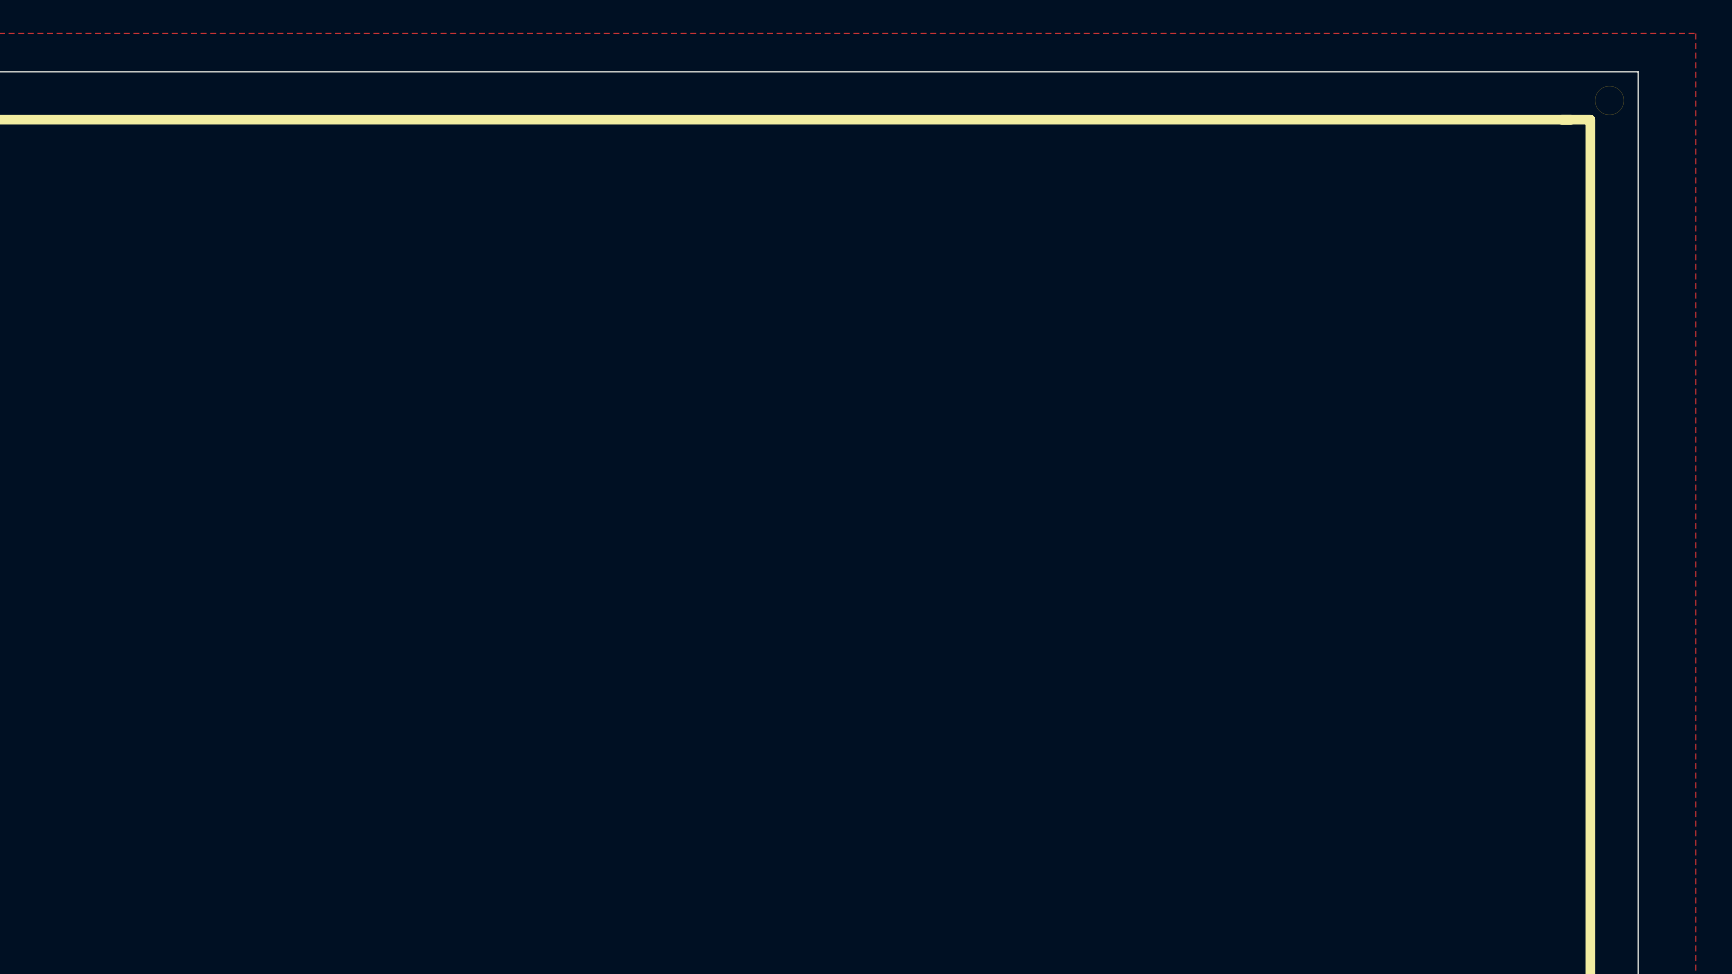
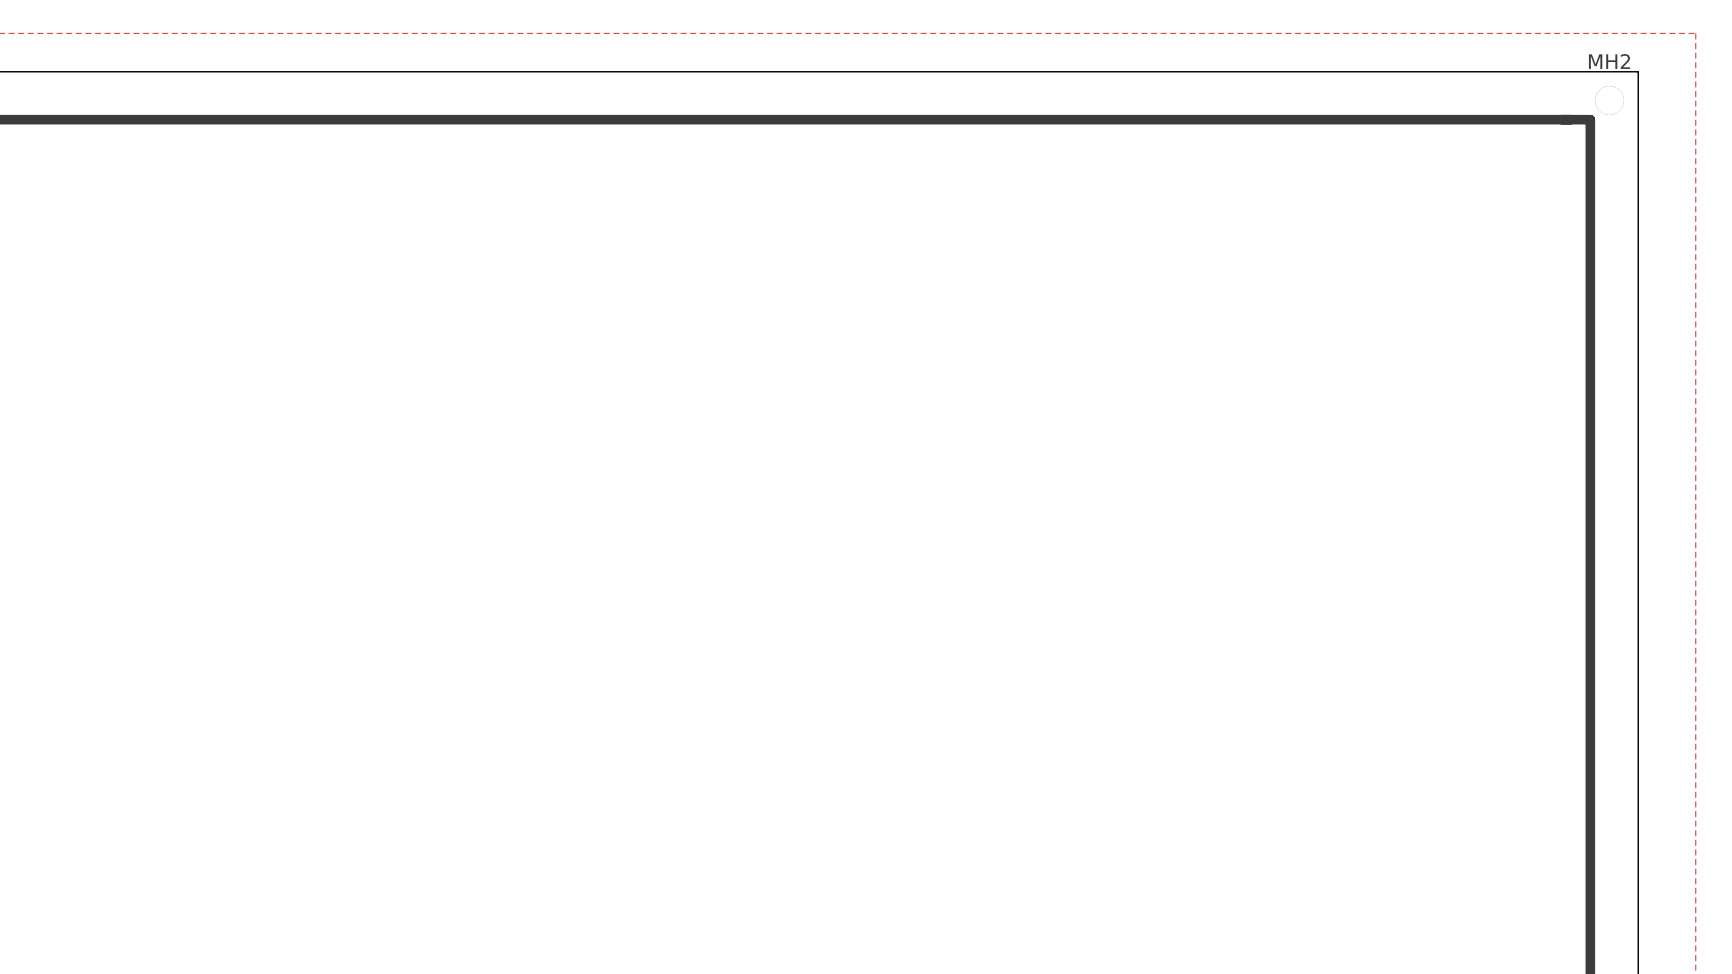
MH2 name: none -> MH2 (1609, 61)

